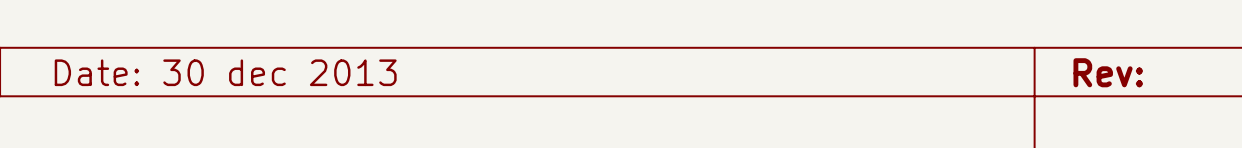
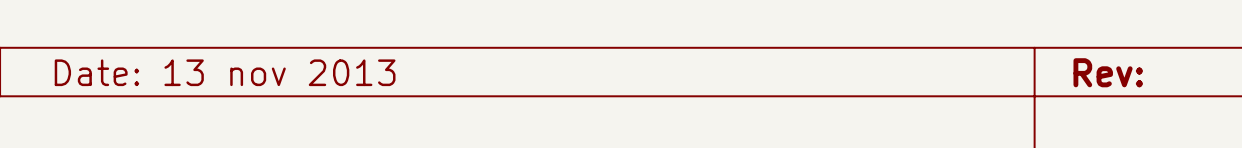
title block: Date: 30 dec 2013 (225, 72) -> Date: 13 nov 2013 (225, 72)

